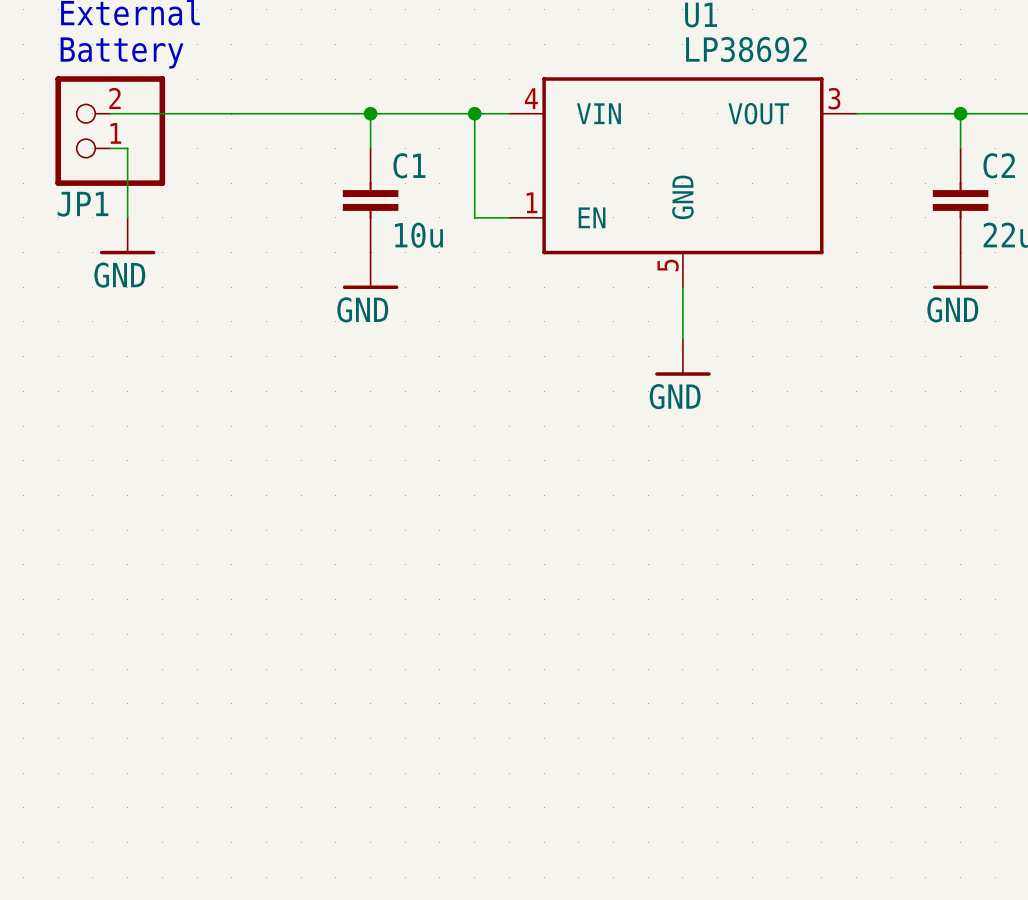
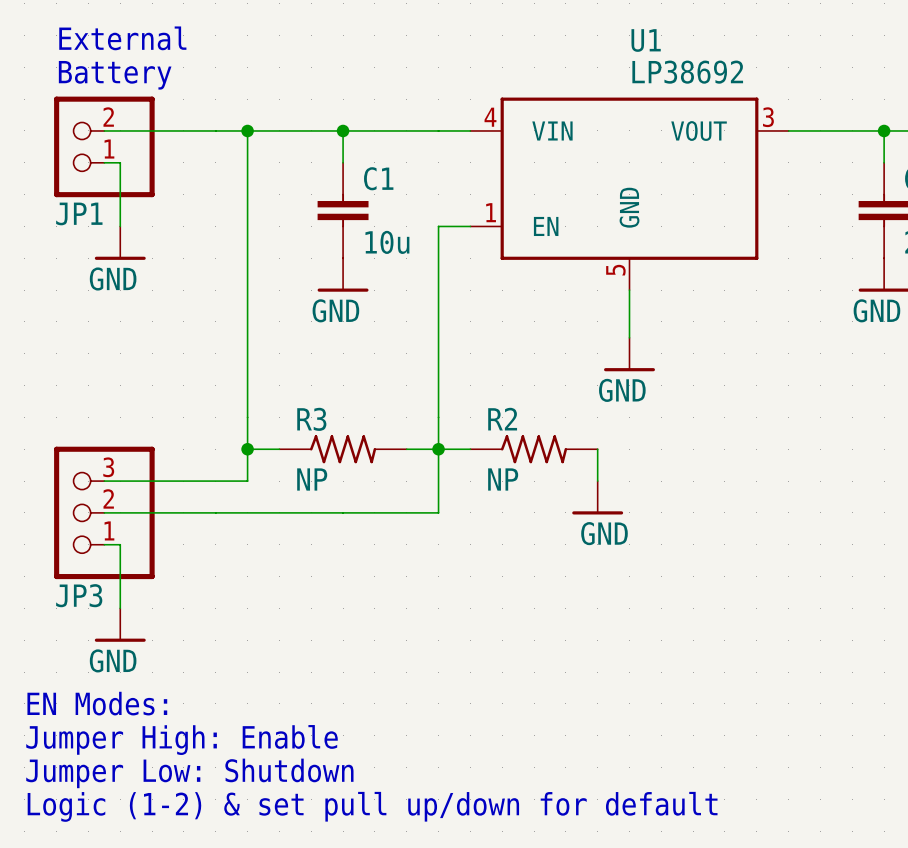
wire: none -> (247, 130) (247, 481) (104, 481)
junction: none -> (247, 130)
wire: (474, 113) (474, 217) -> (104, 512) (438, 512) (438, 226)
junction: (474, 113) -> none
wire: none -> (247, 449) (279, 449)
junction: none -> (247, 449)
R3: none -> NP (343, 449)
wire: none -> (406, 449) (470, 449)
junction: none -> (438, 449)
R2: none -> NP (534, 449)
wire: none -> (597, 449) (597, 481)
power symbol: none -> GND (597, 497)
JP3: none -> (104, 512)
wire: none -> (104, 544) (120, 544) (120, 608)
power symbol: none -> GND (120, 625)
text: none -> EN Modes: (97, 703)
text: none -> Jumper High: Enable (182, 740)
text: none -> Jumper Low: Shutdown (189, 773)
text: none -> Logic (1-2) & set pull up/down for default (372, 806)

